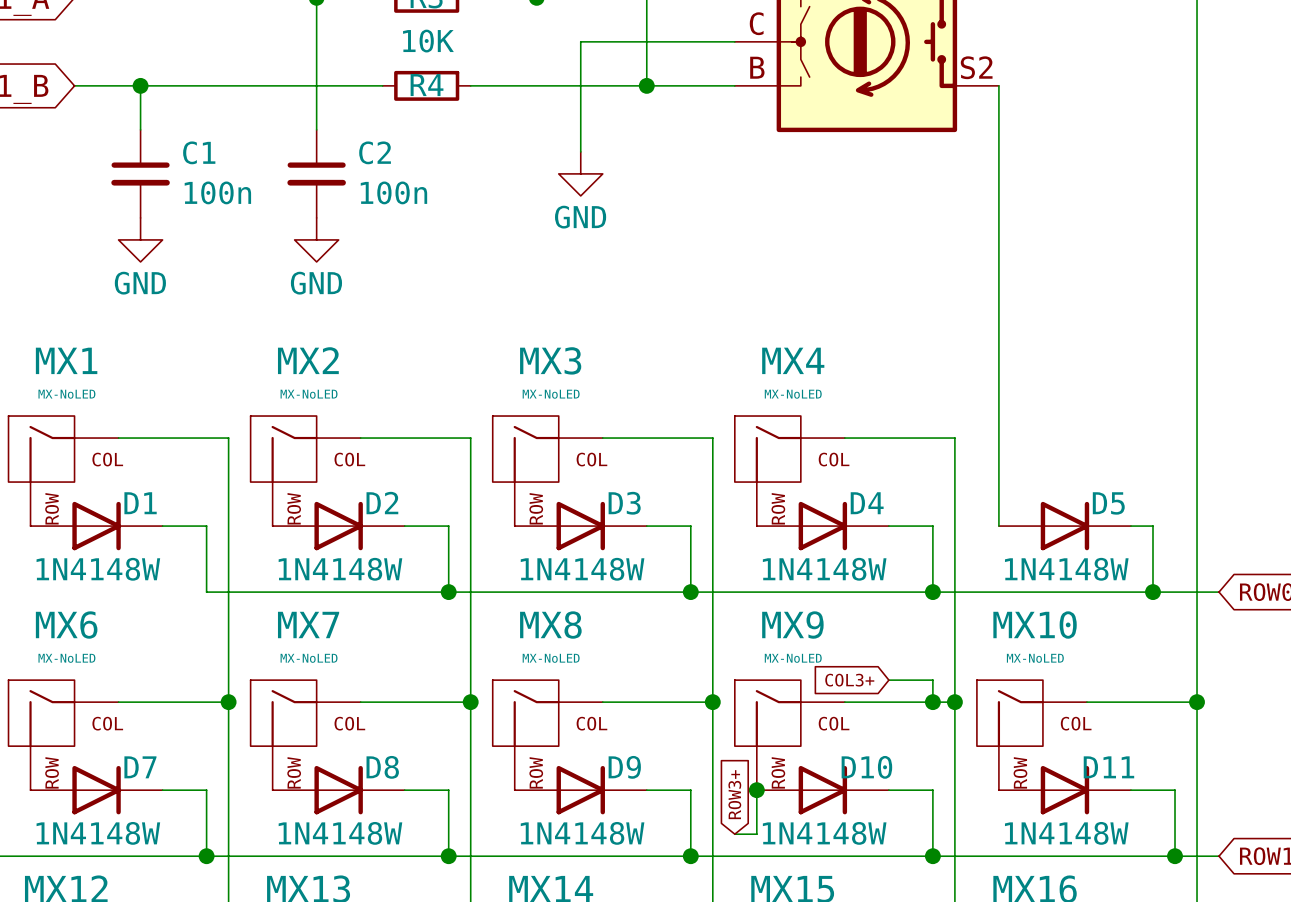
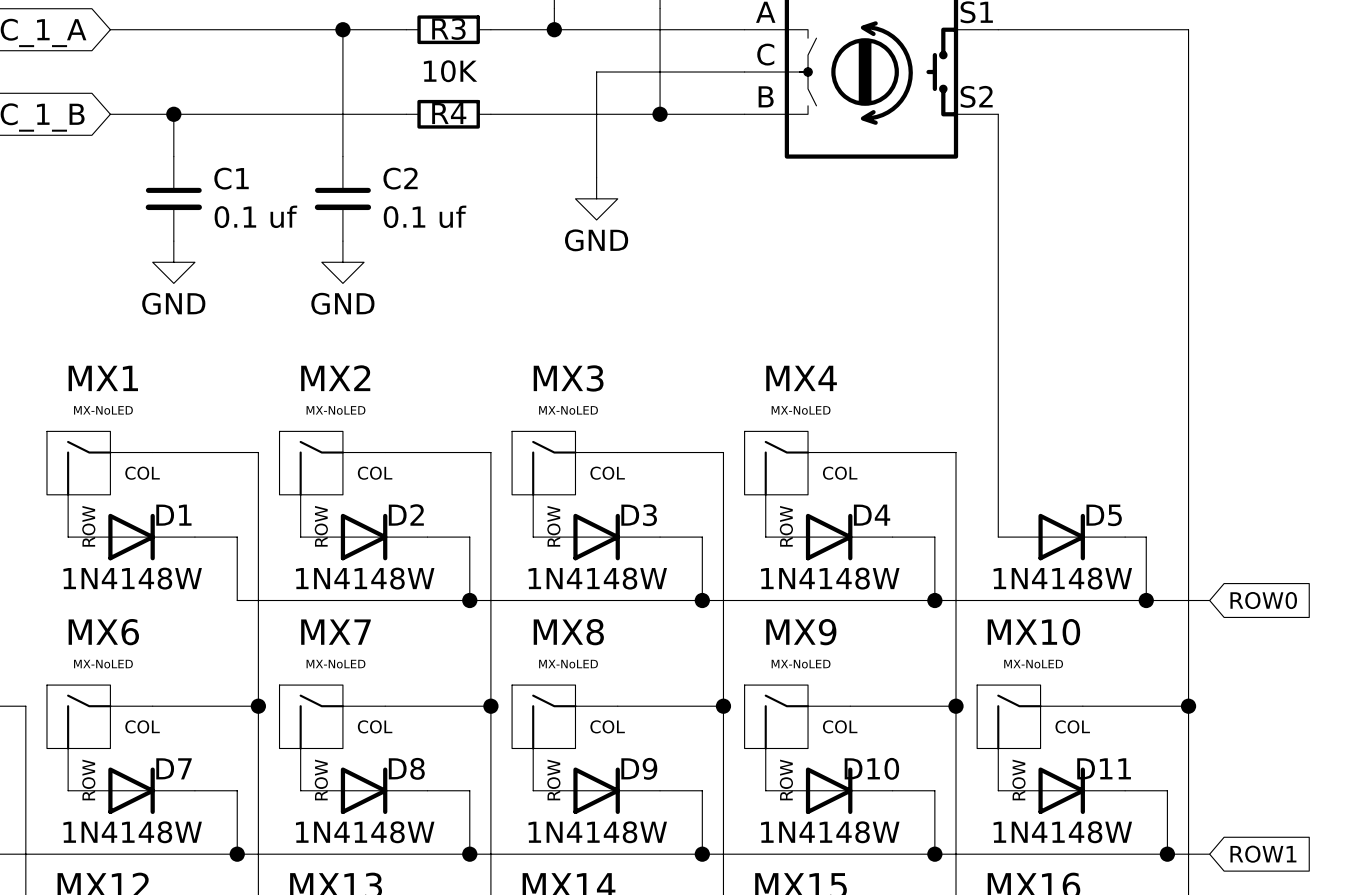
C1 value: 100n (217, 192) -> 0.1 uf (255, 216)
C2 value: 100n (393, 192) -> 0.1 uf (425, 216)
global label: COL3+ (849, 680) -> none
wire: (888, 680) (932, 680) (932, 702) -> none
junction: (932, 702) -> none
wire: (756, 790) (756, 834) (734, 834) -> none
junction: (756, 790) -> none
global label: ROW3+ (734, 794) -> none

